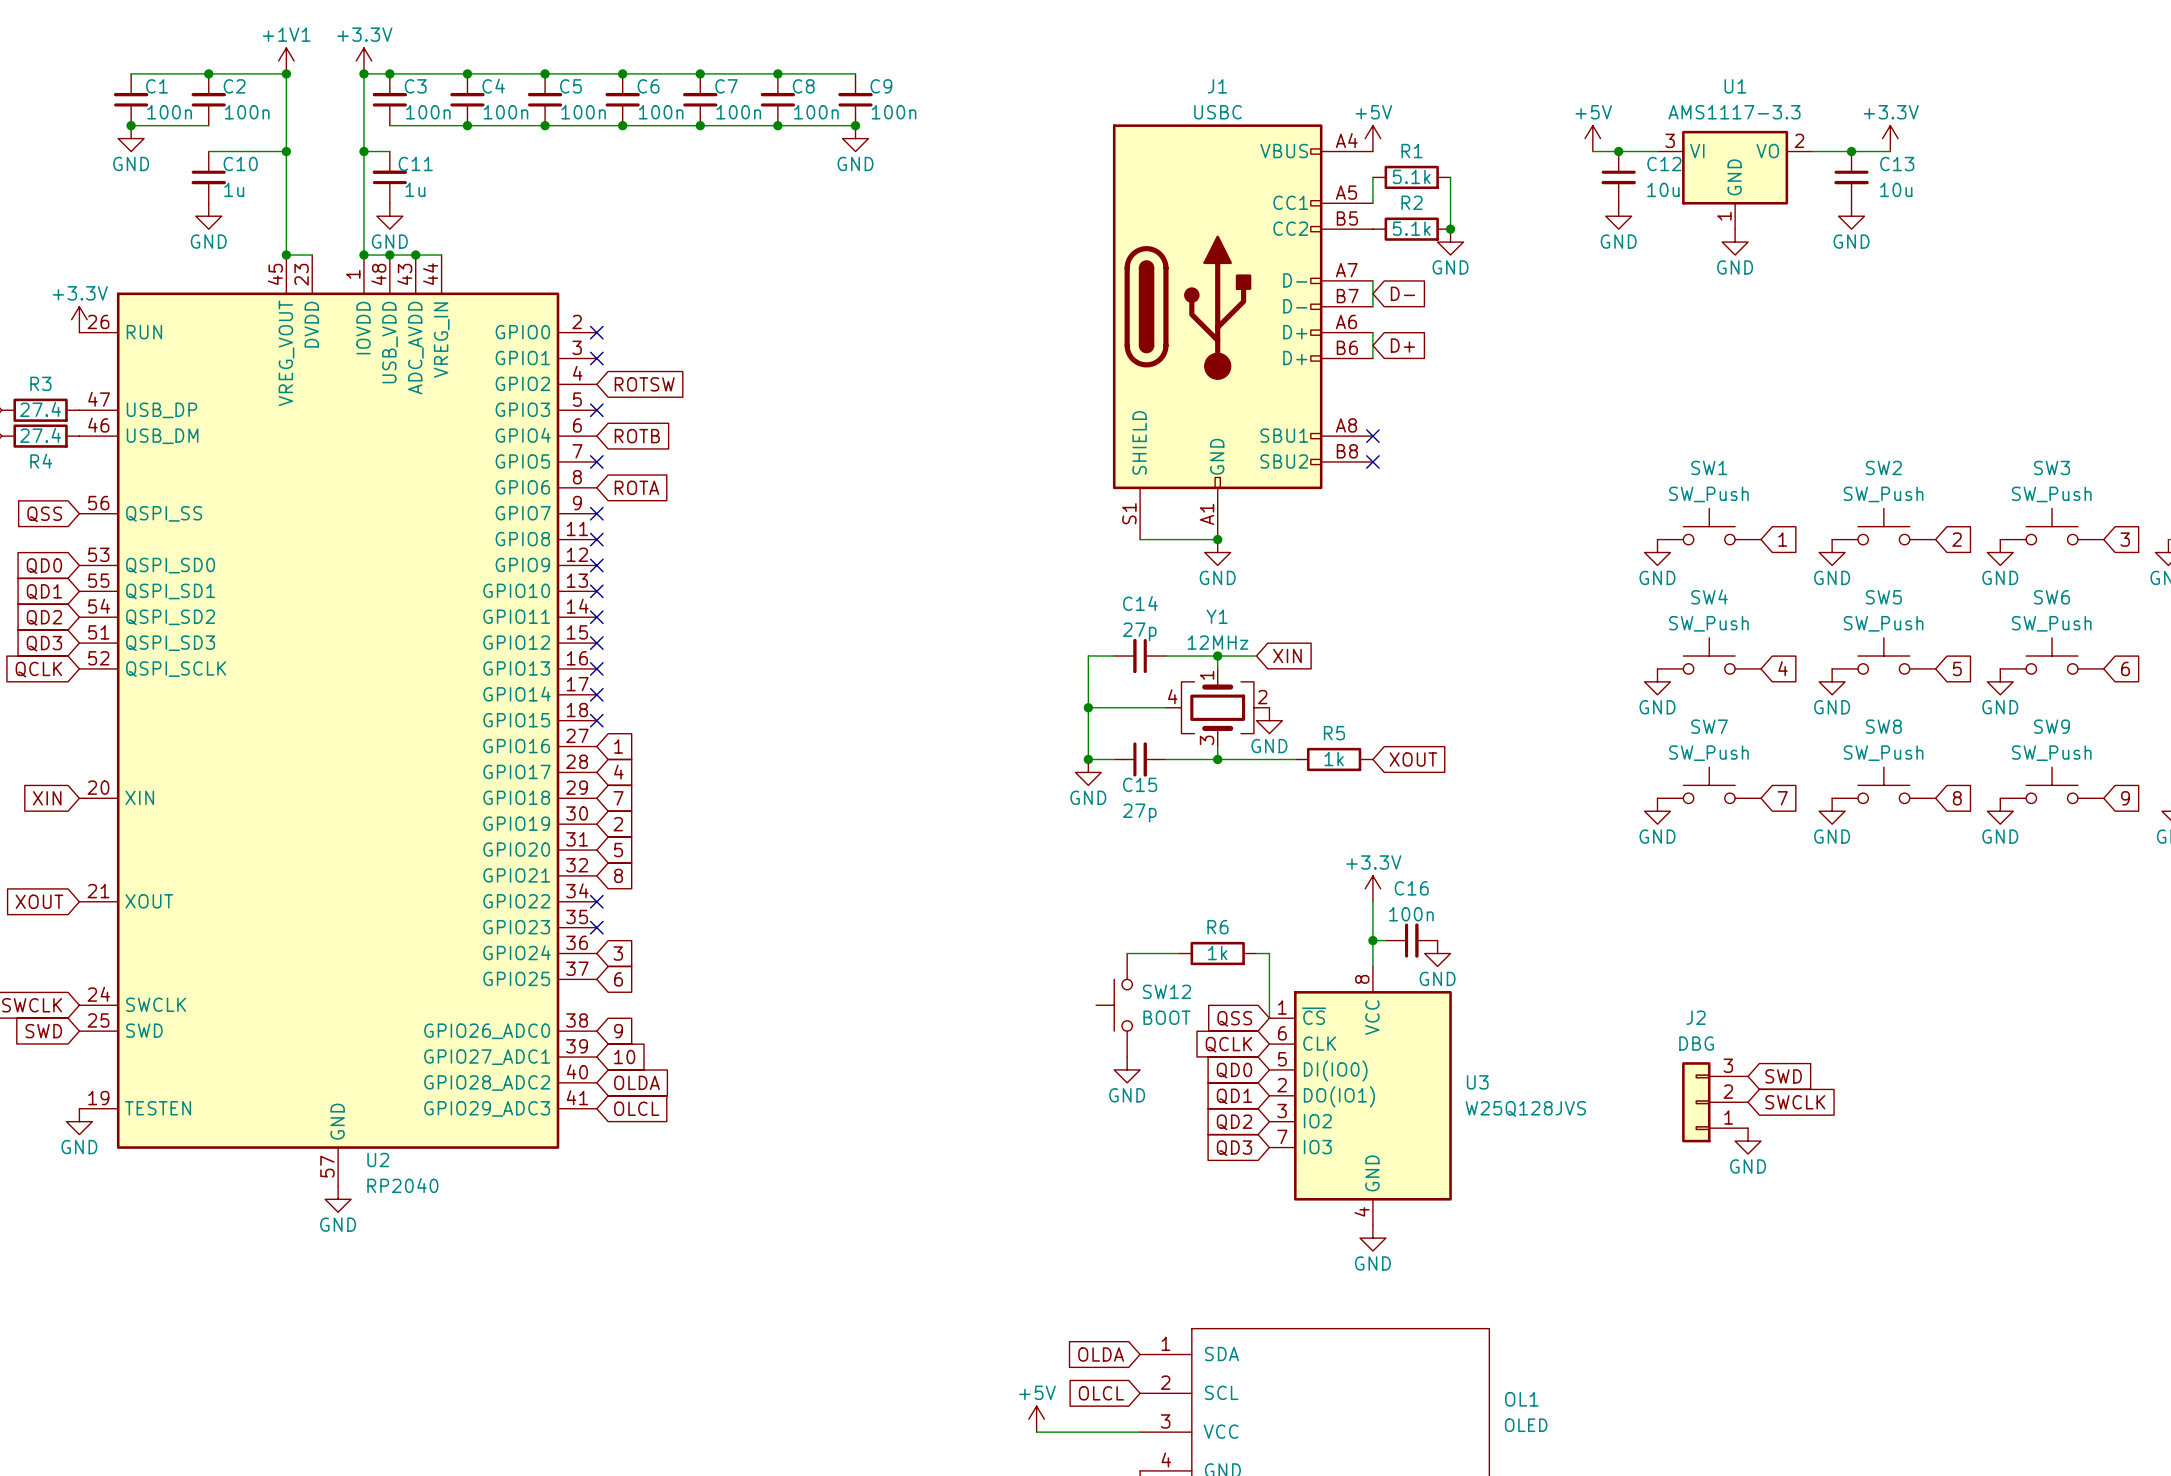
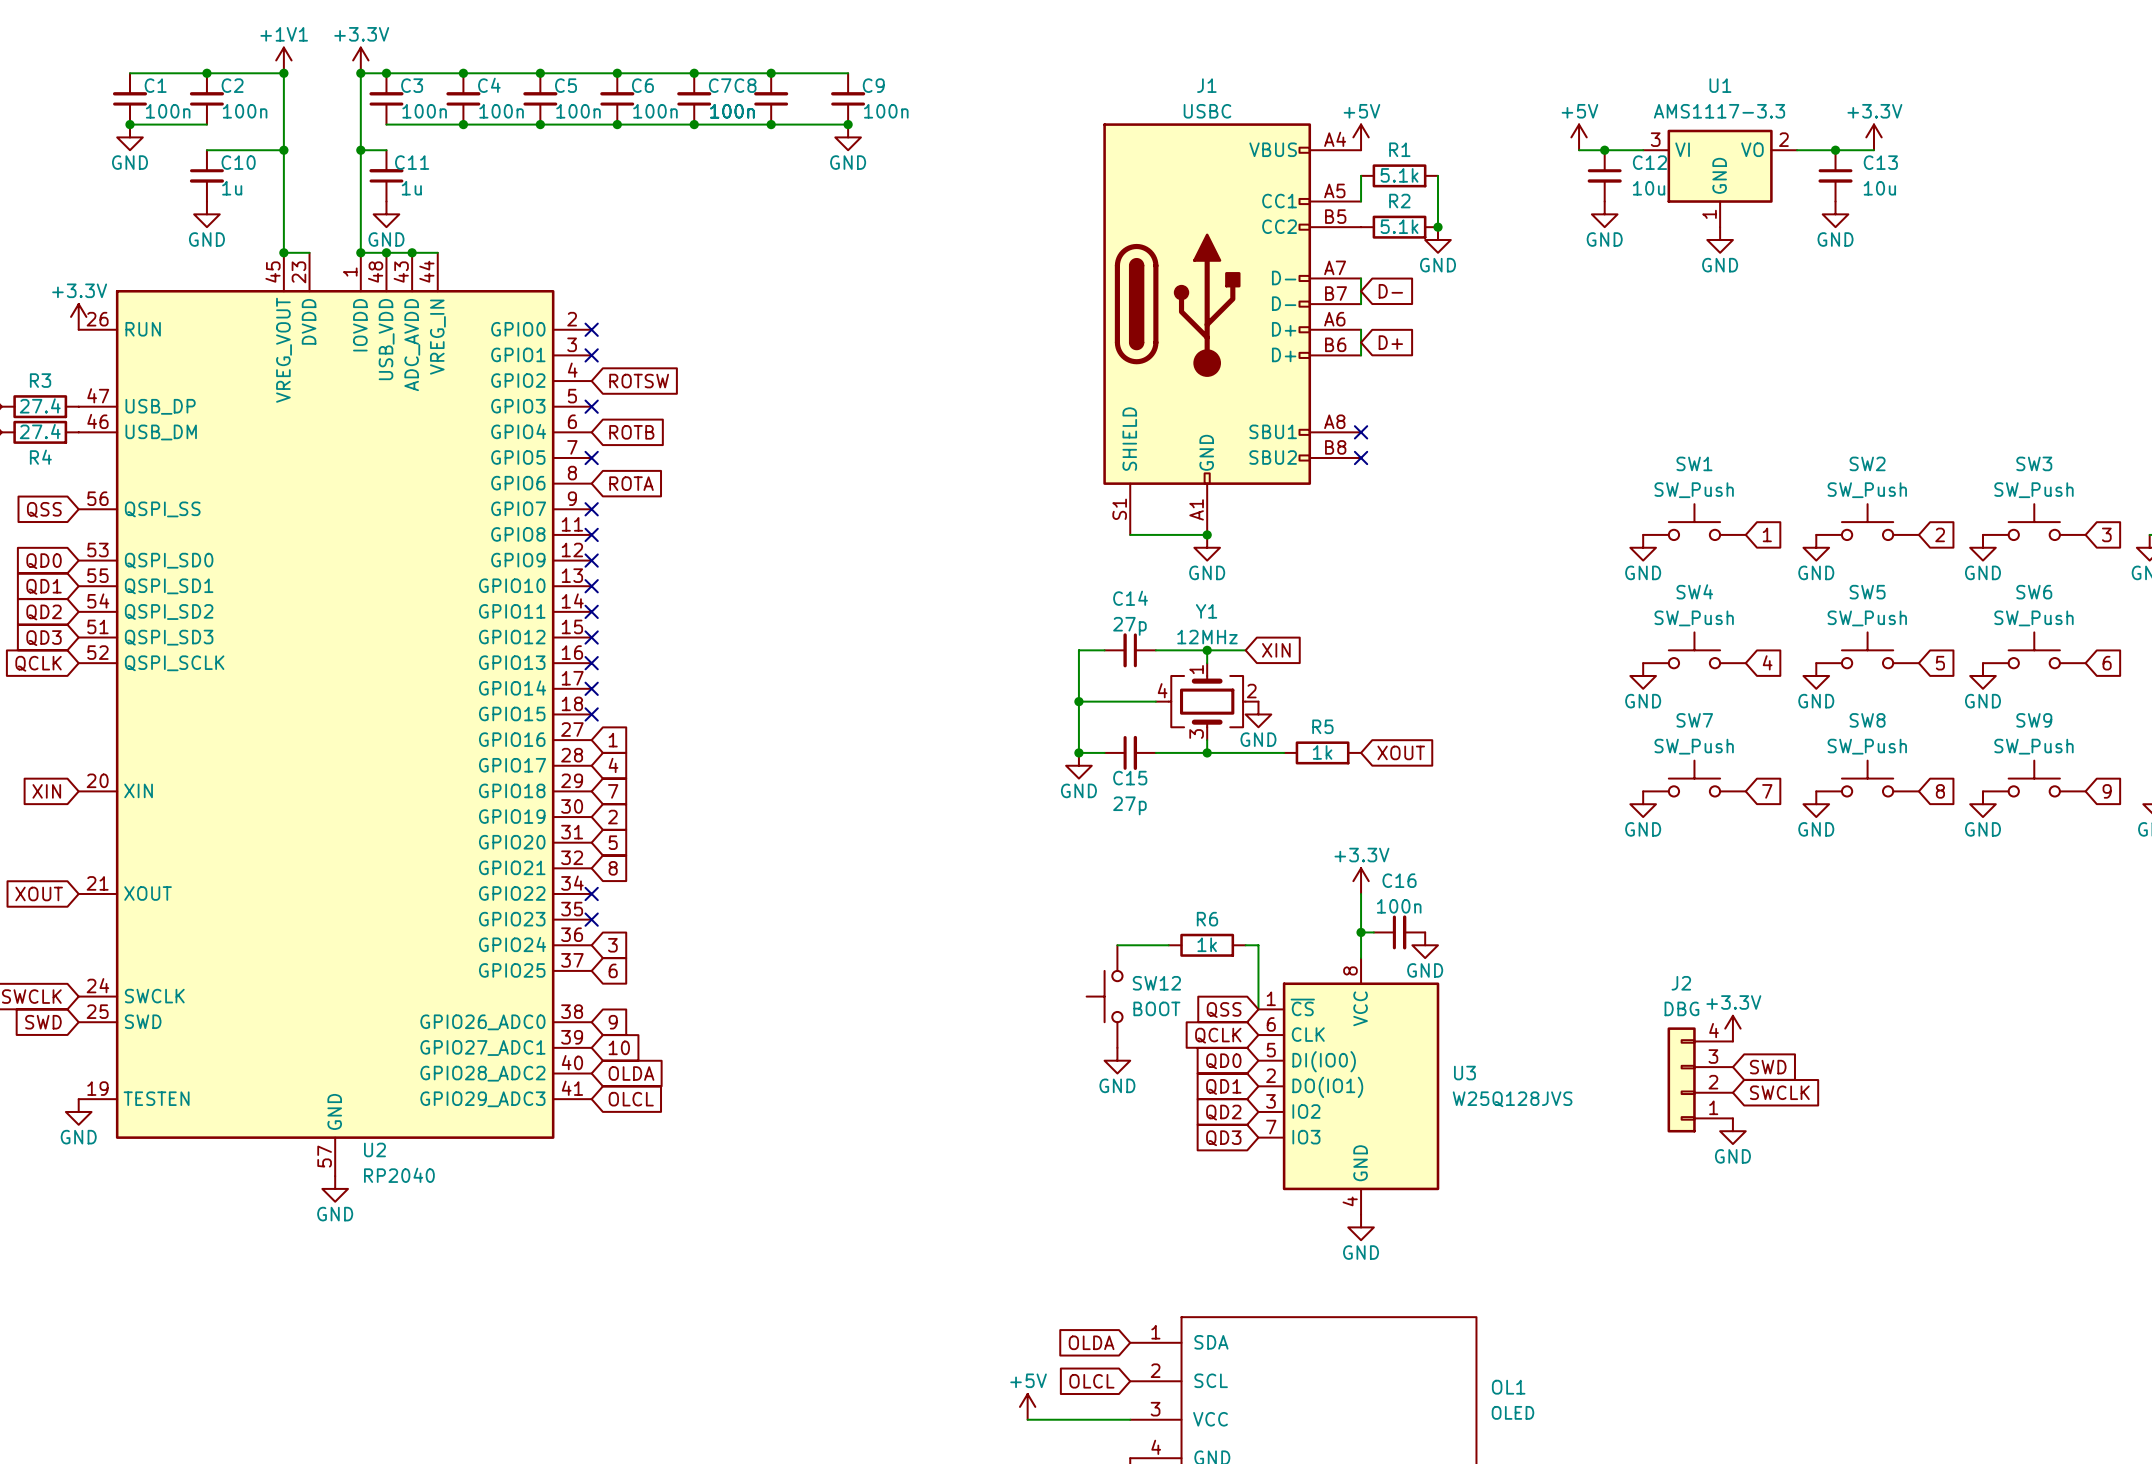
C8 name position: C8 (803, 86) -> C8 (745, 85)
C7 value position: 100n (816, 112) -> 100n (732, 111)
power symbol: none -> +3.3V (1732, 1028)
J2 symbol: [1682, 1062, 1749, 1143] -> [1667, 1027, 1733, 1133]

